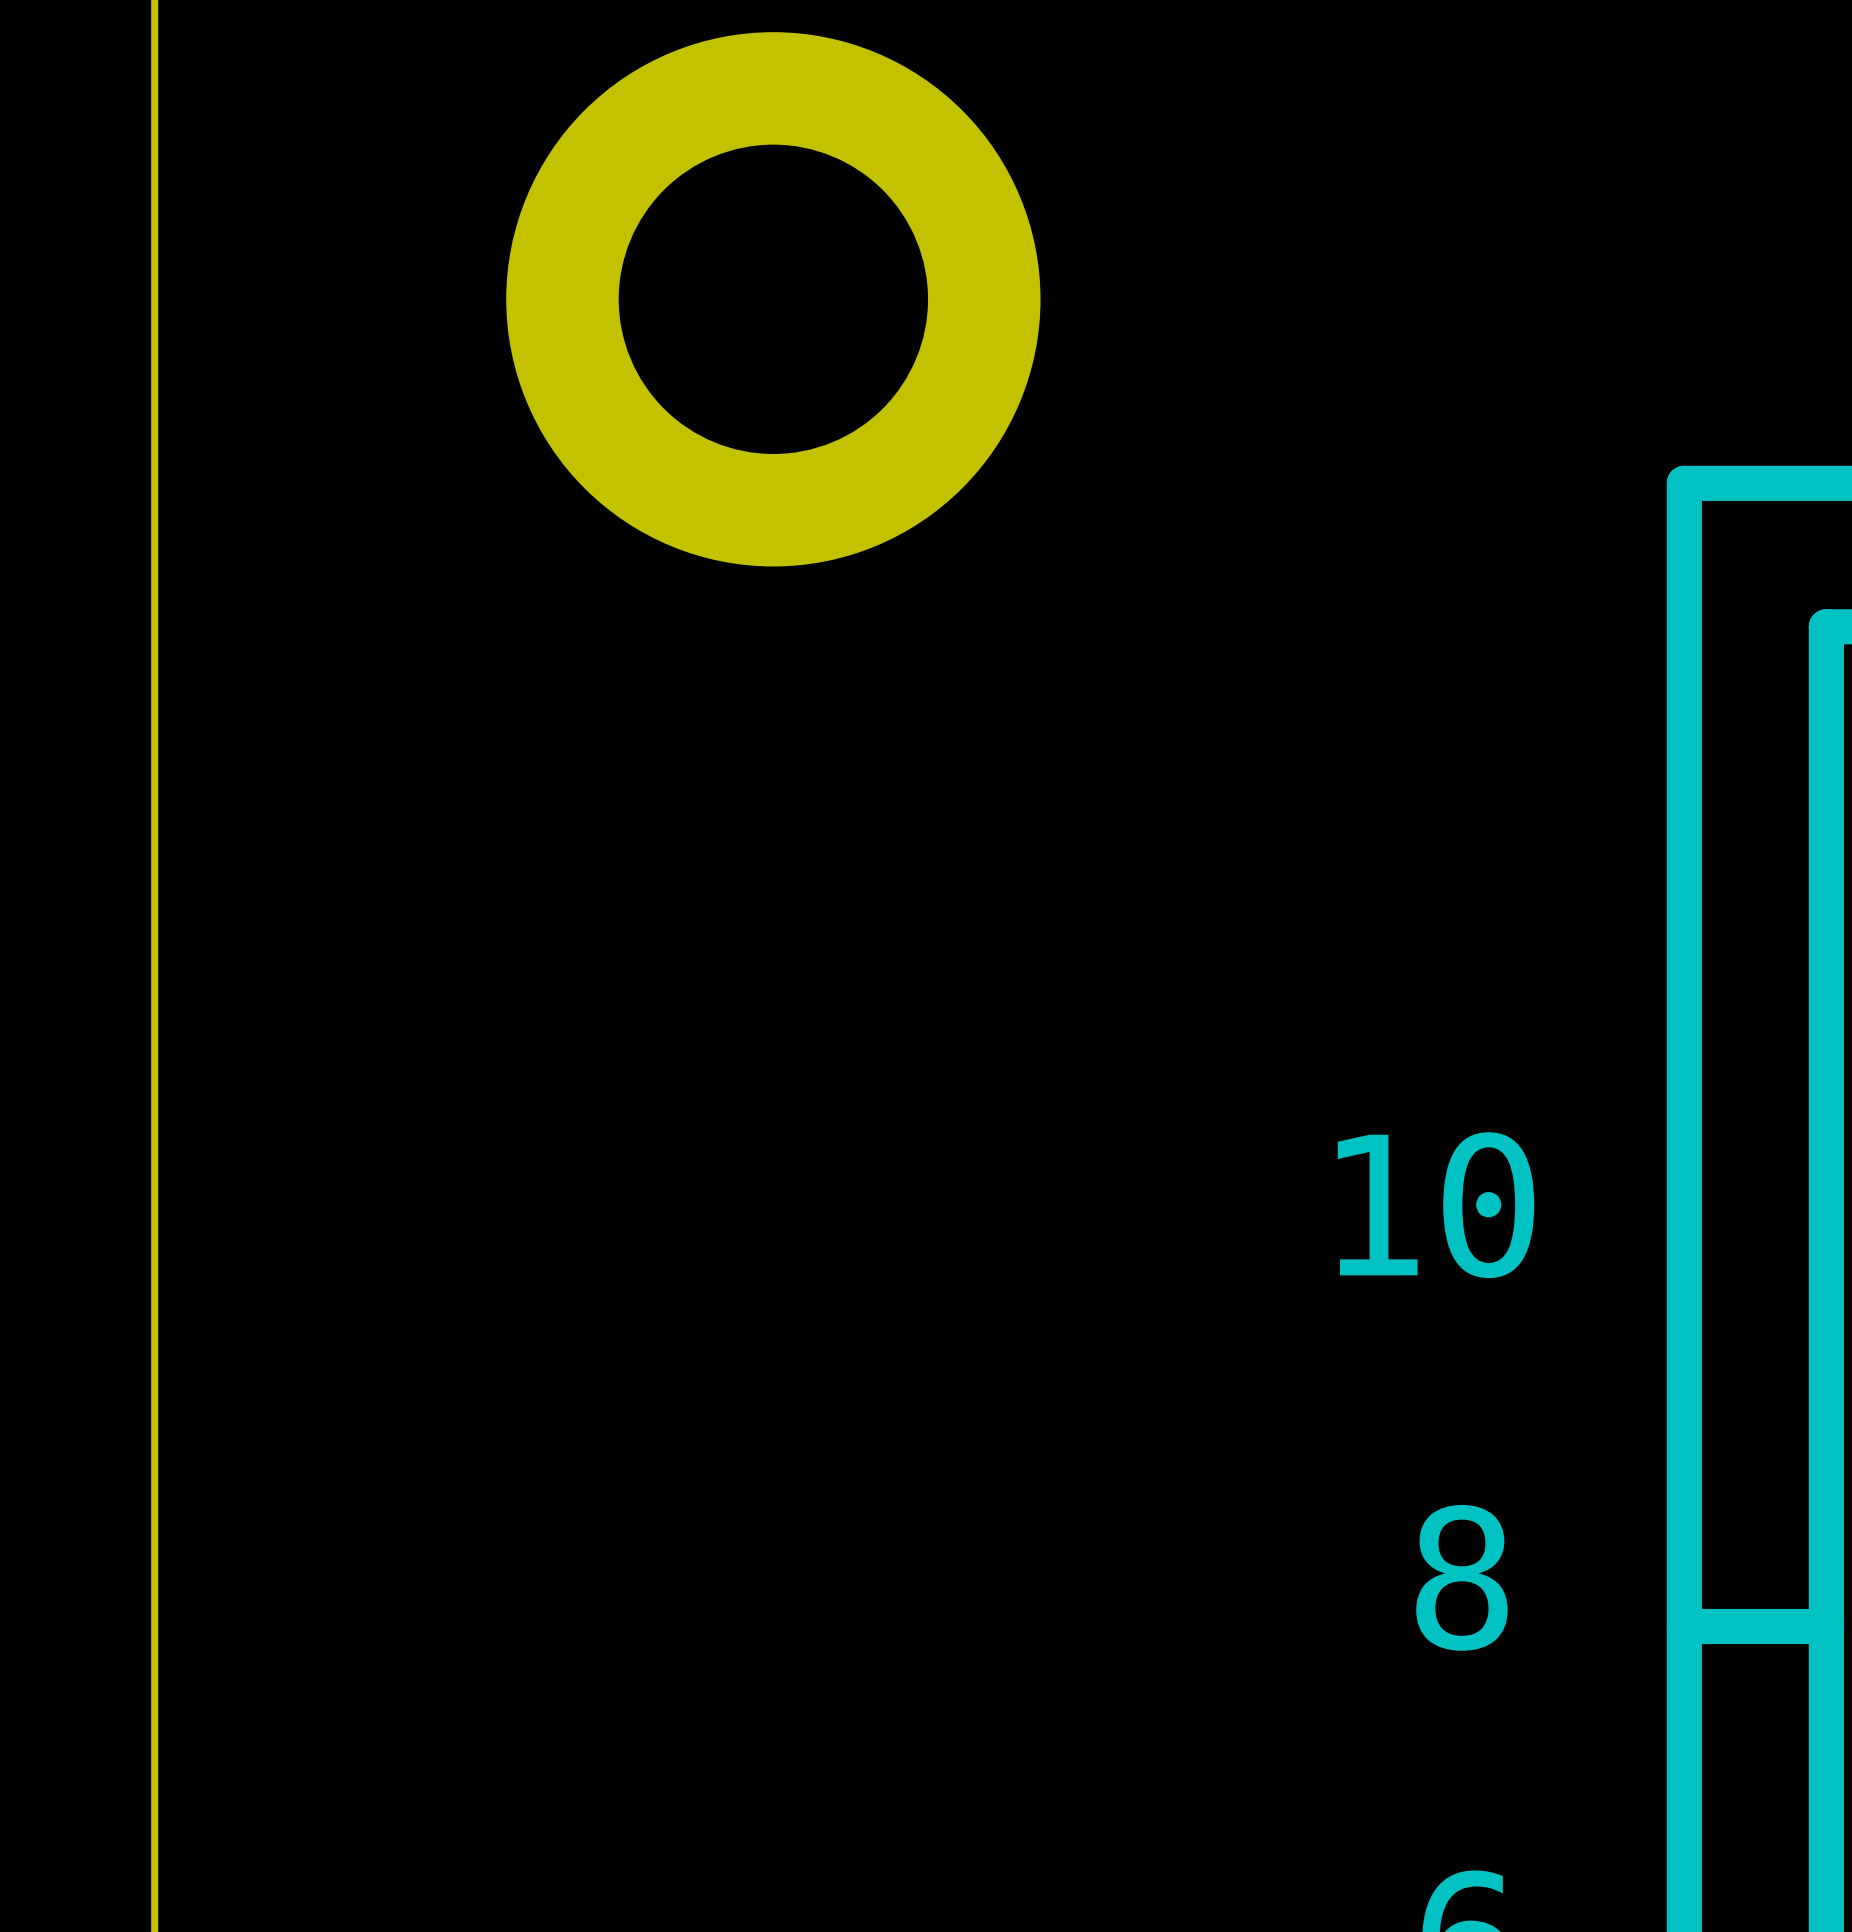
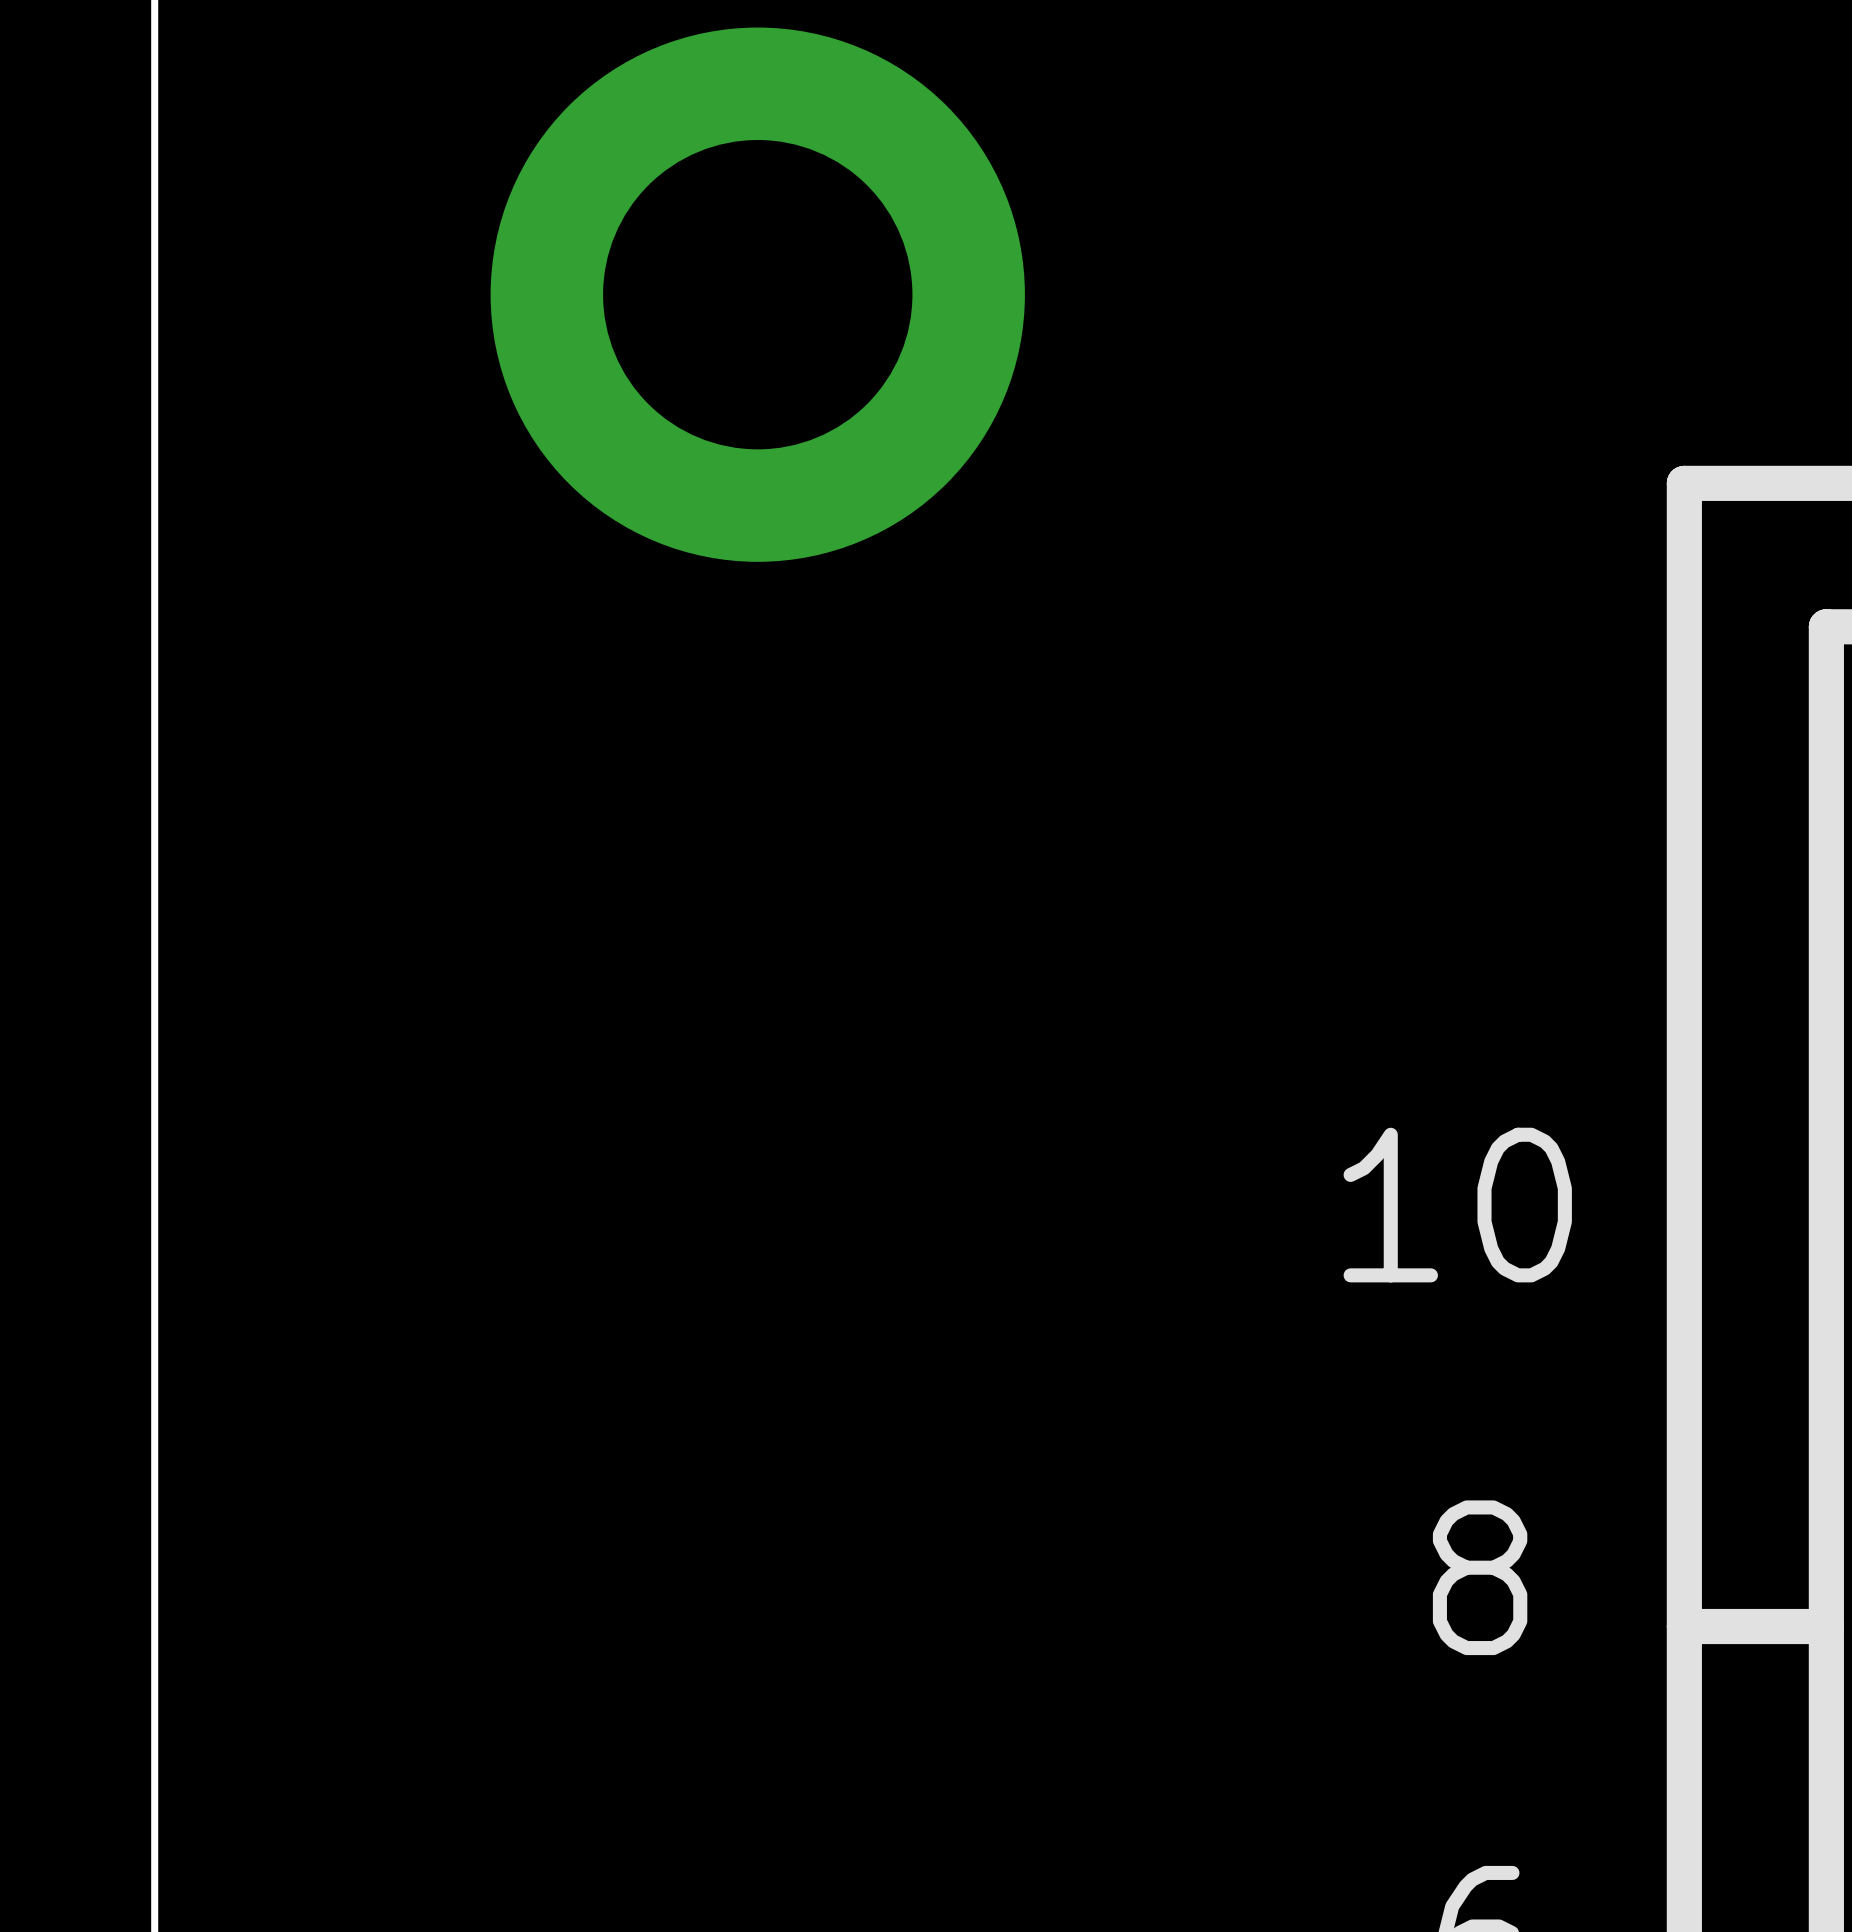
part position: (773, 299) -> (757, 294)

